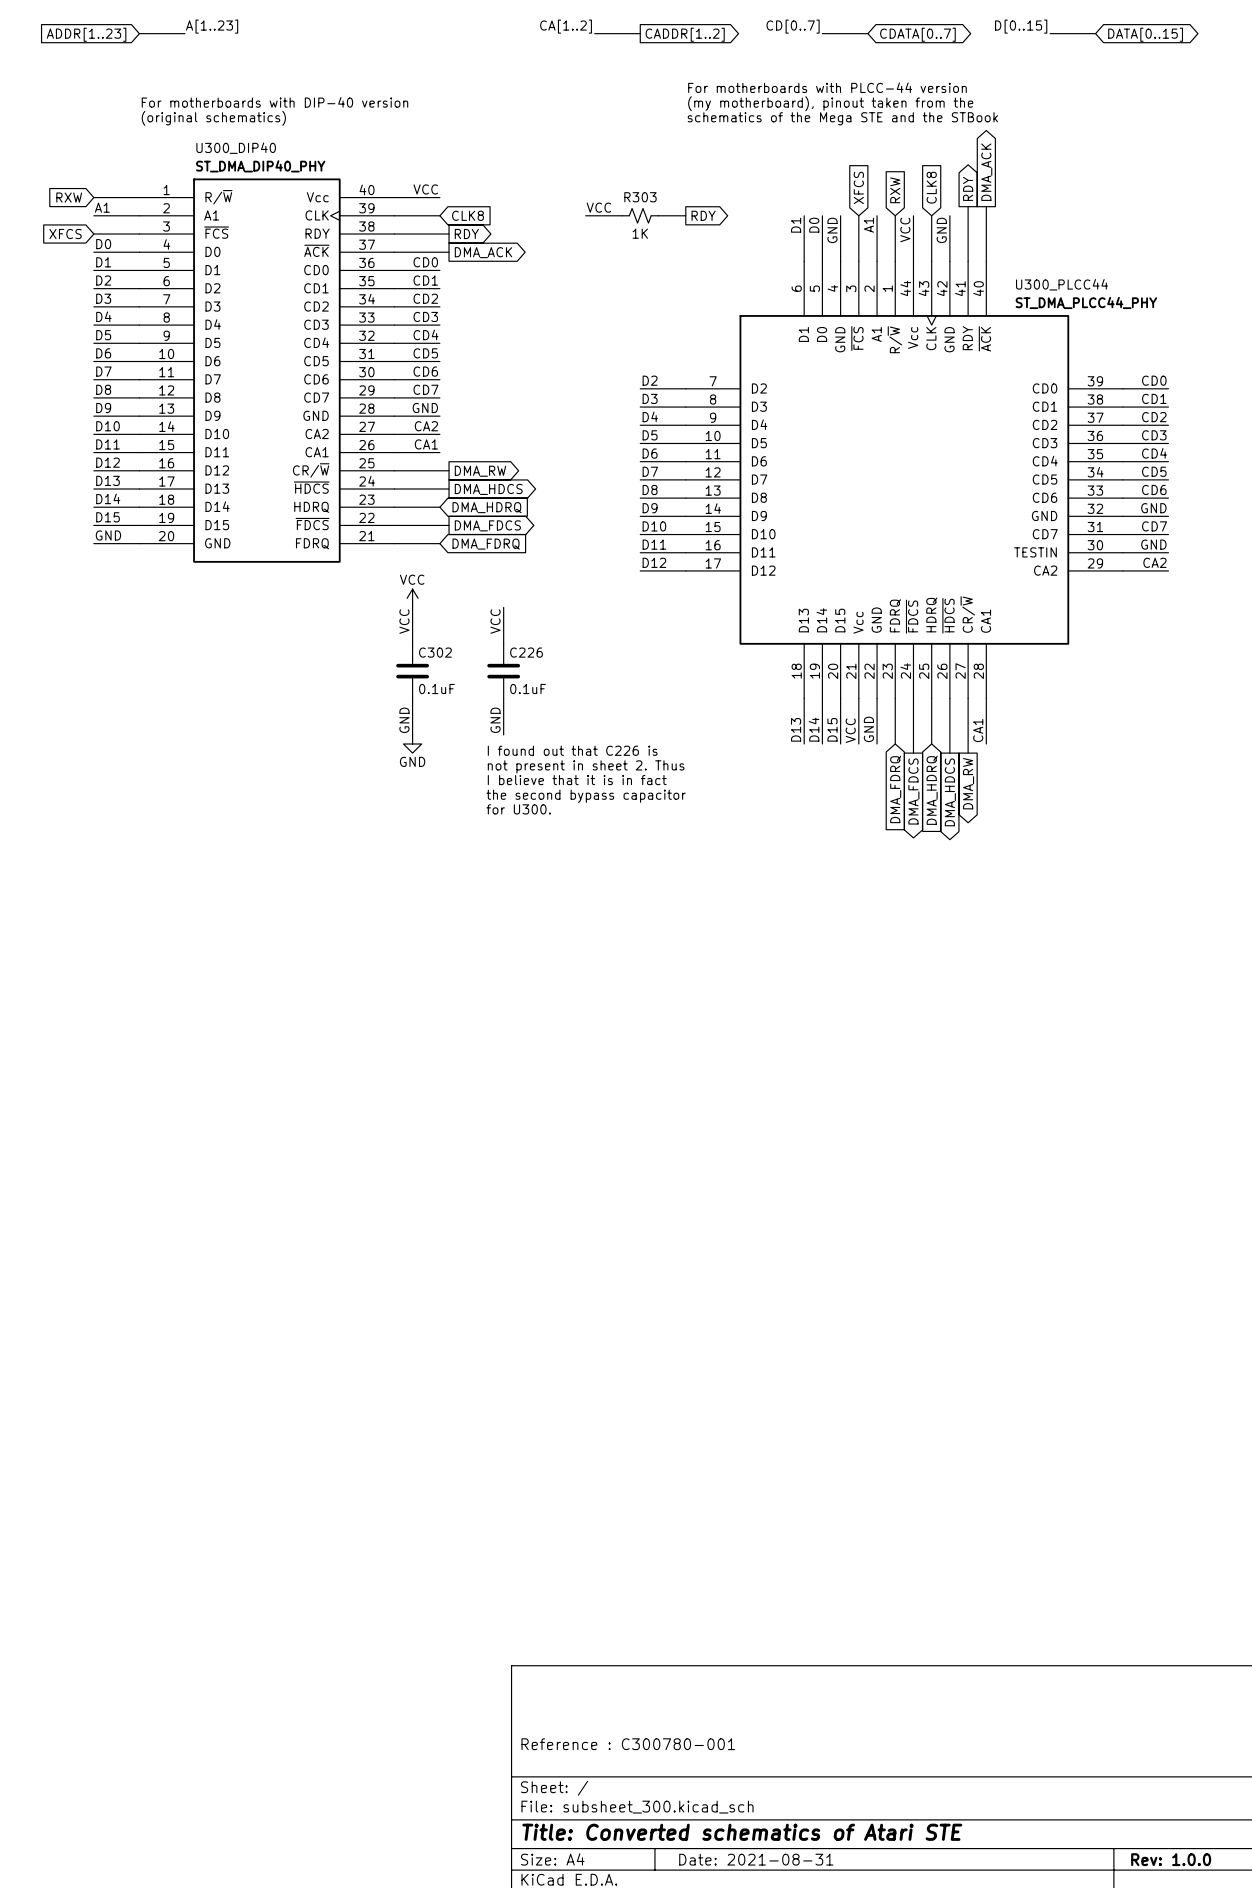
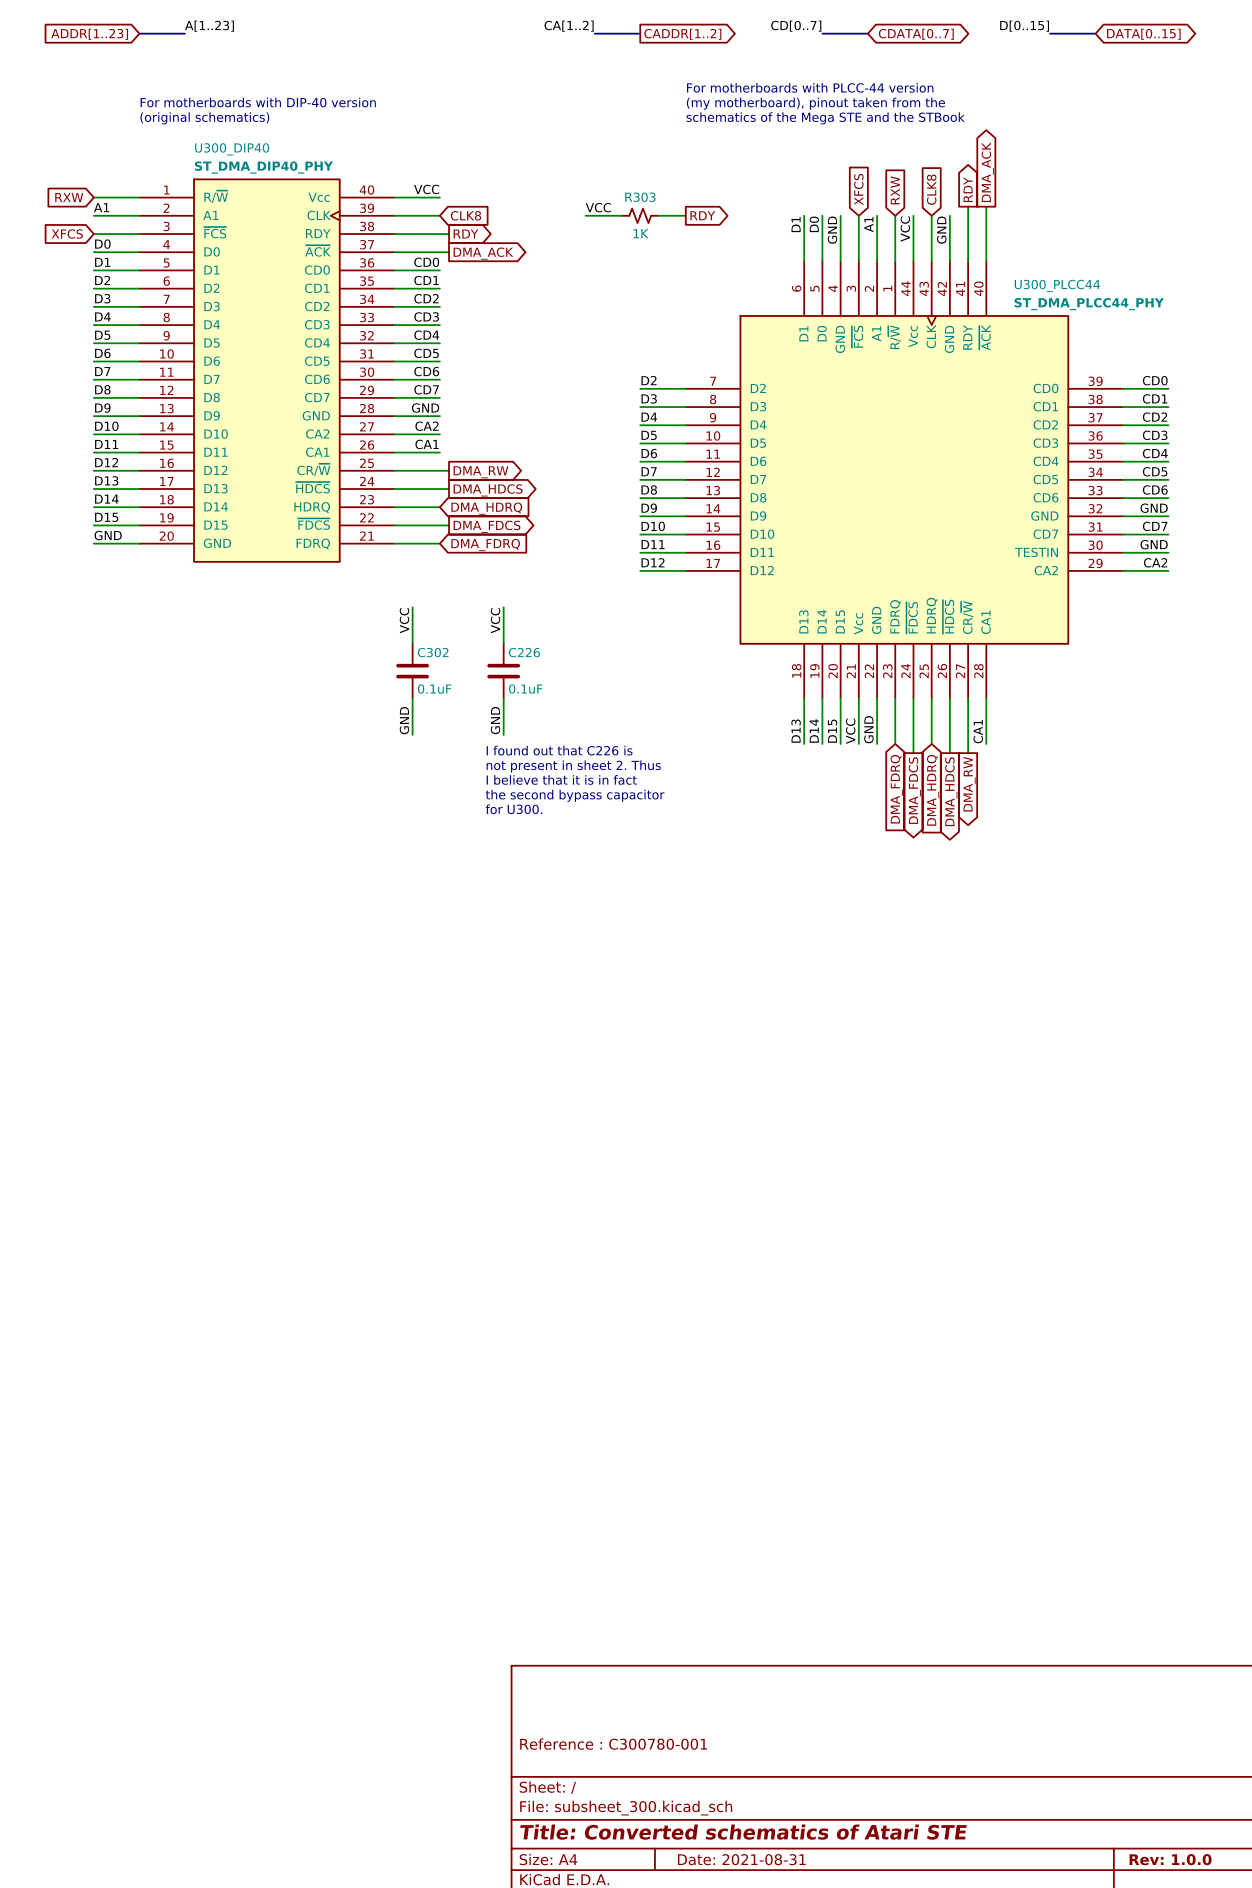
power symbol: VCC (412, 598) -> none
power symbol: GND (412, 743) -> none

